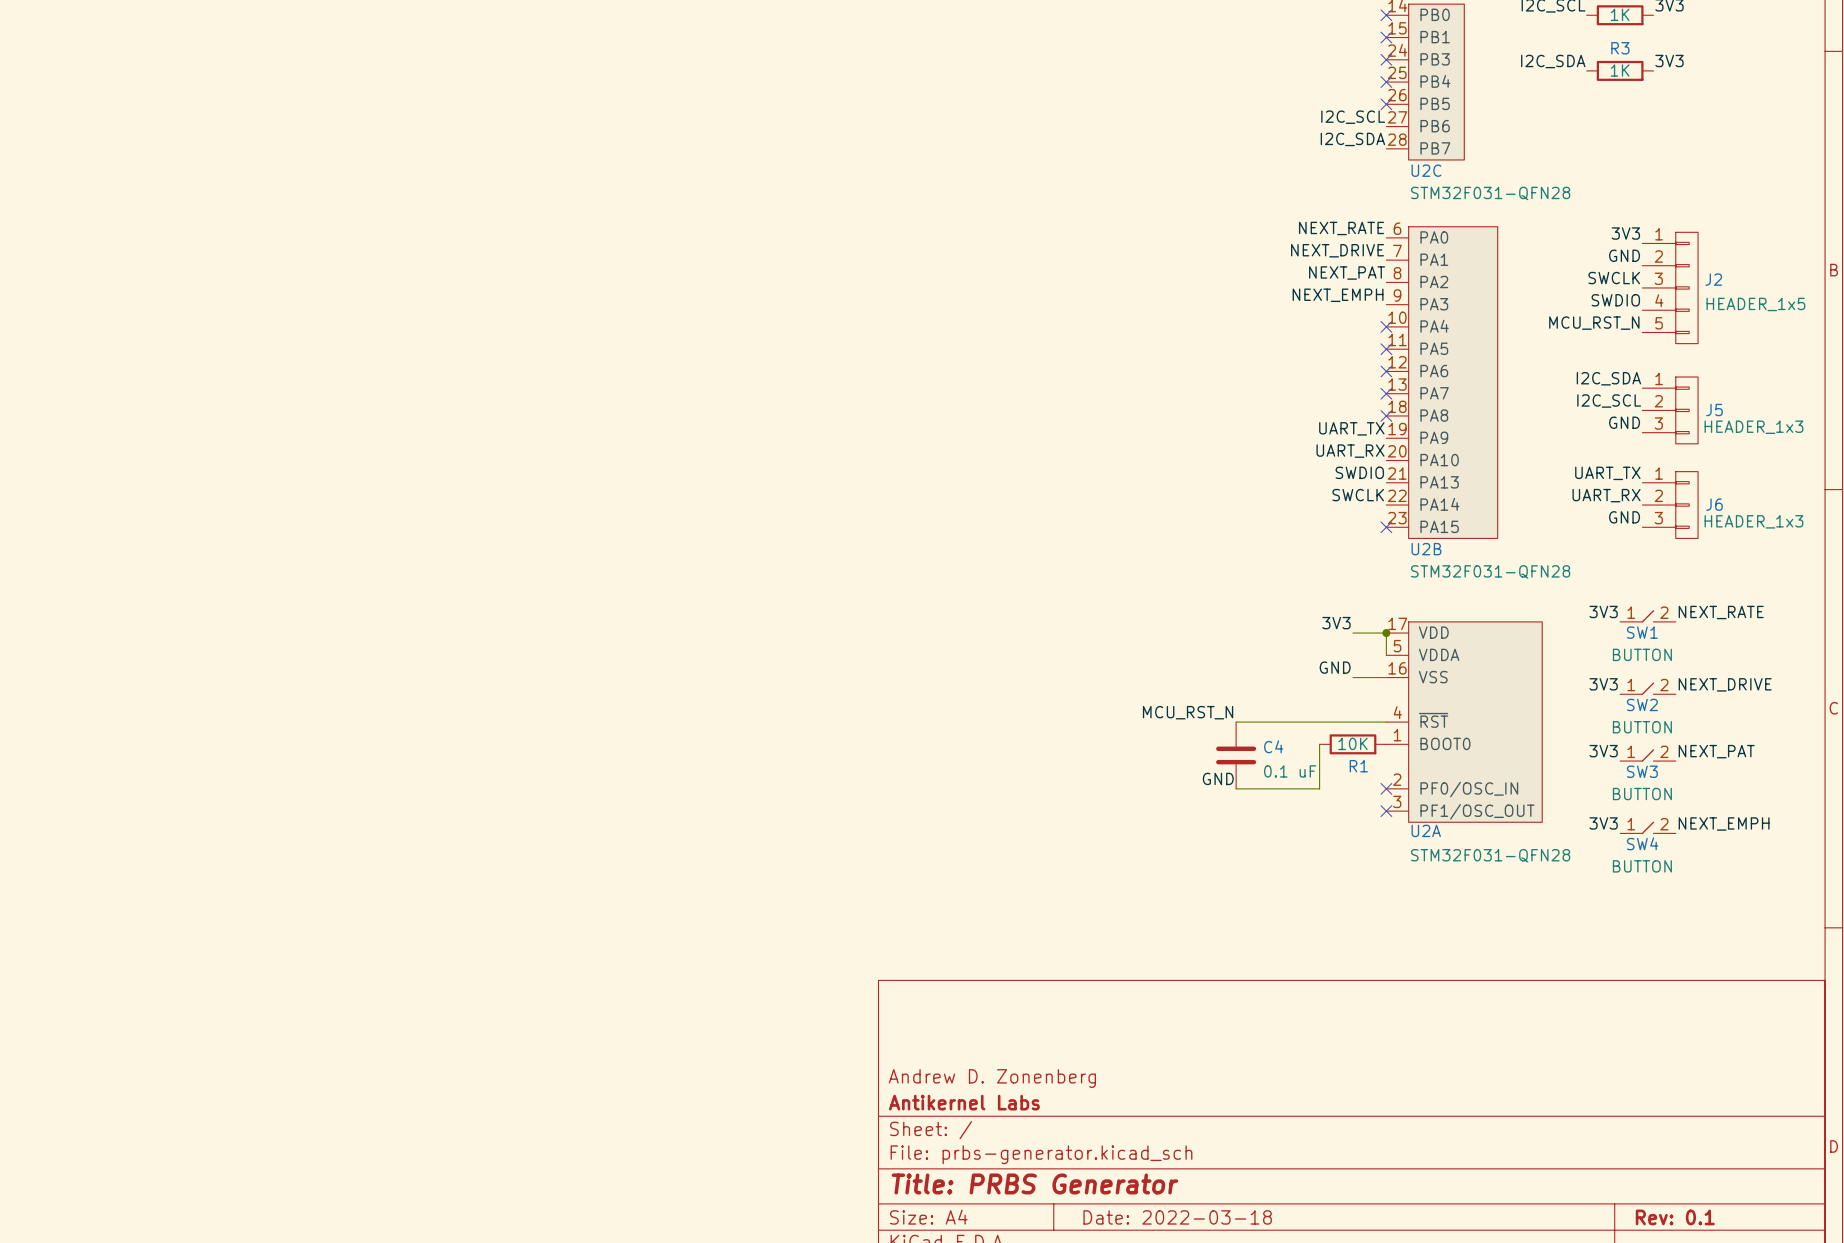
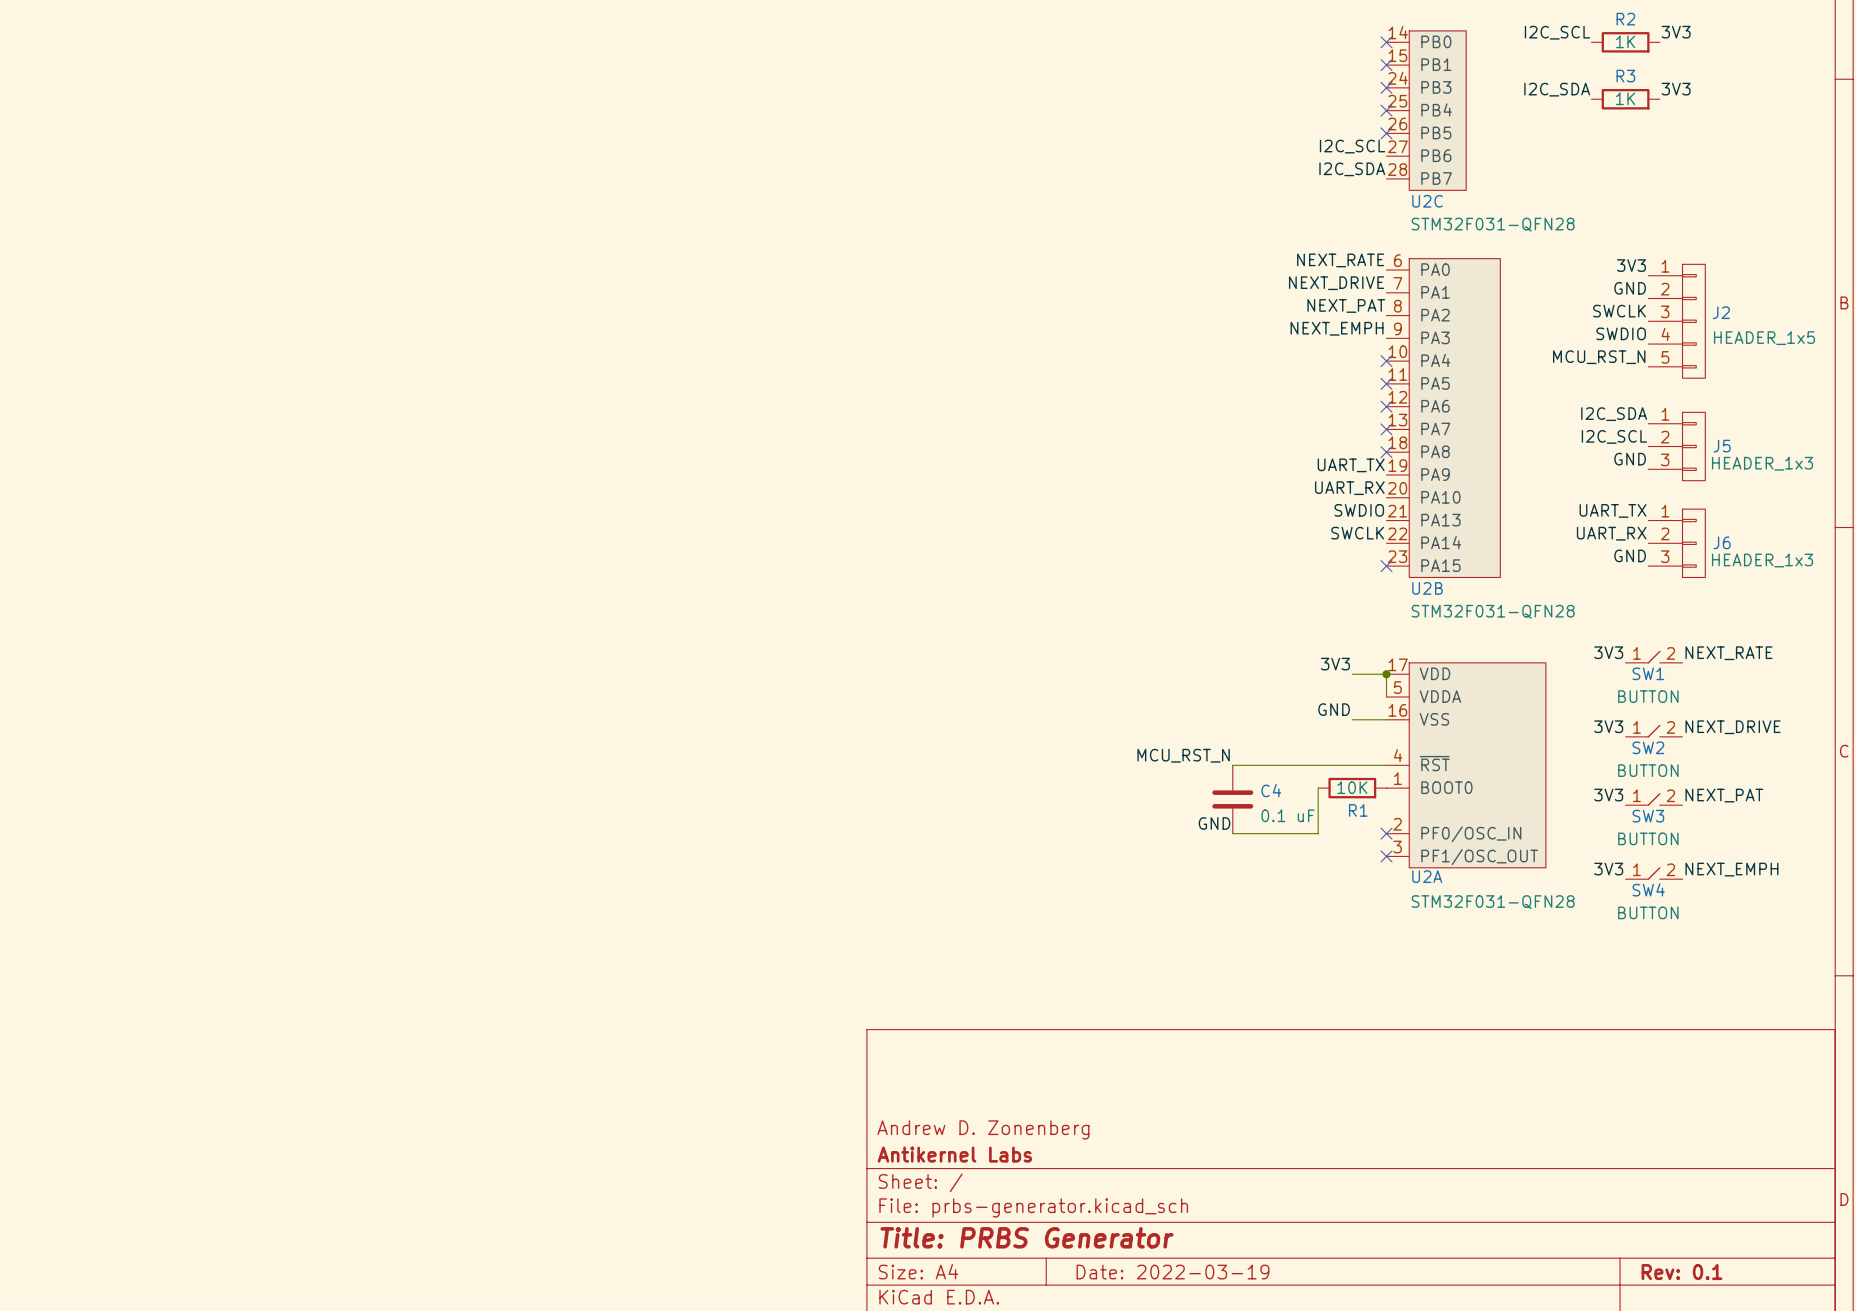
title block: Date: 2022-03-18 (1177, 1217) -> Date: 2022-03-19 (1172, 1272)

